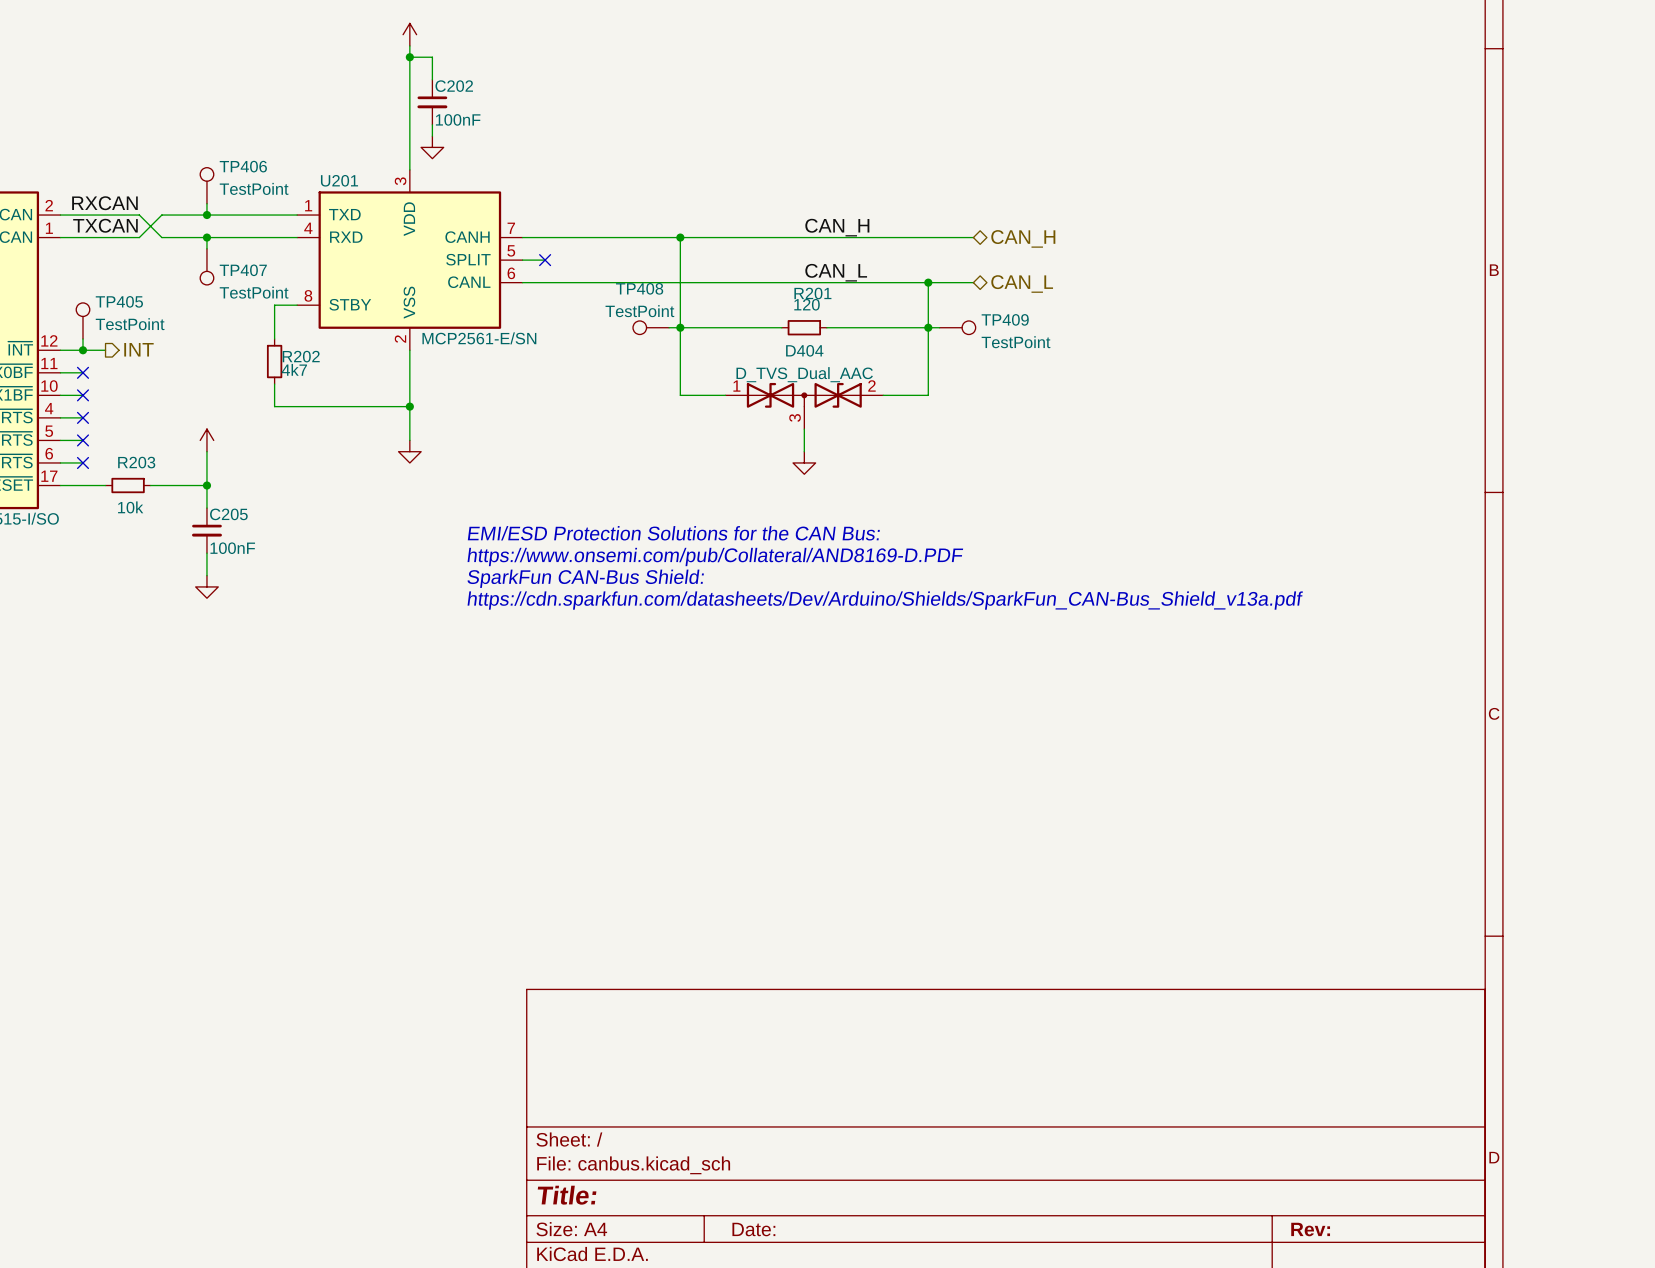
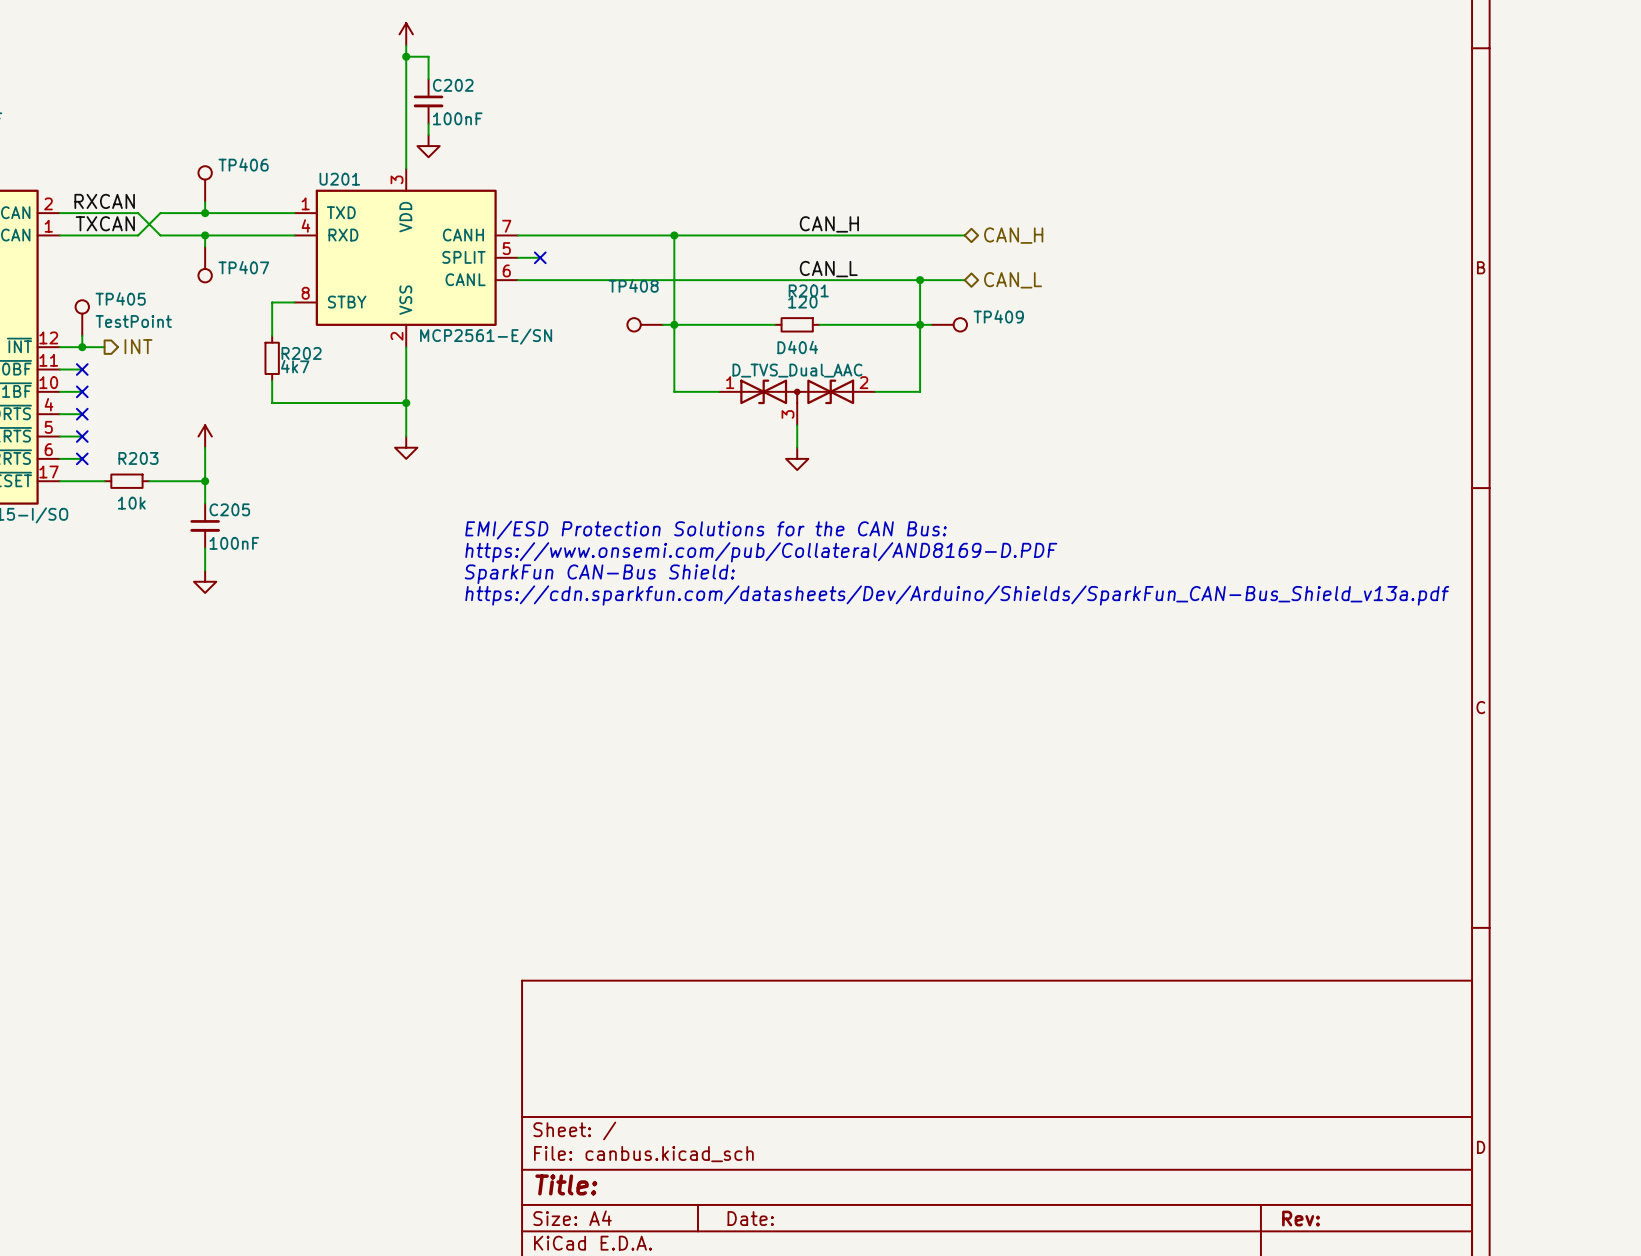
TP406 value: TestPoint (254, 188) -> none
TP407 value: TestPoint (254, 292) -> none
TP408 value: TestPoint (639, 311) -> none
TP409 value: TestPoint (1016, 342) -> none

